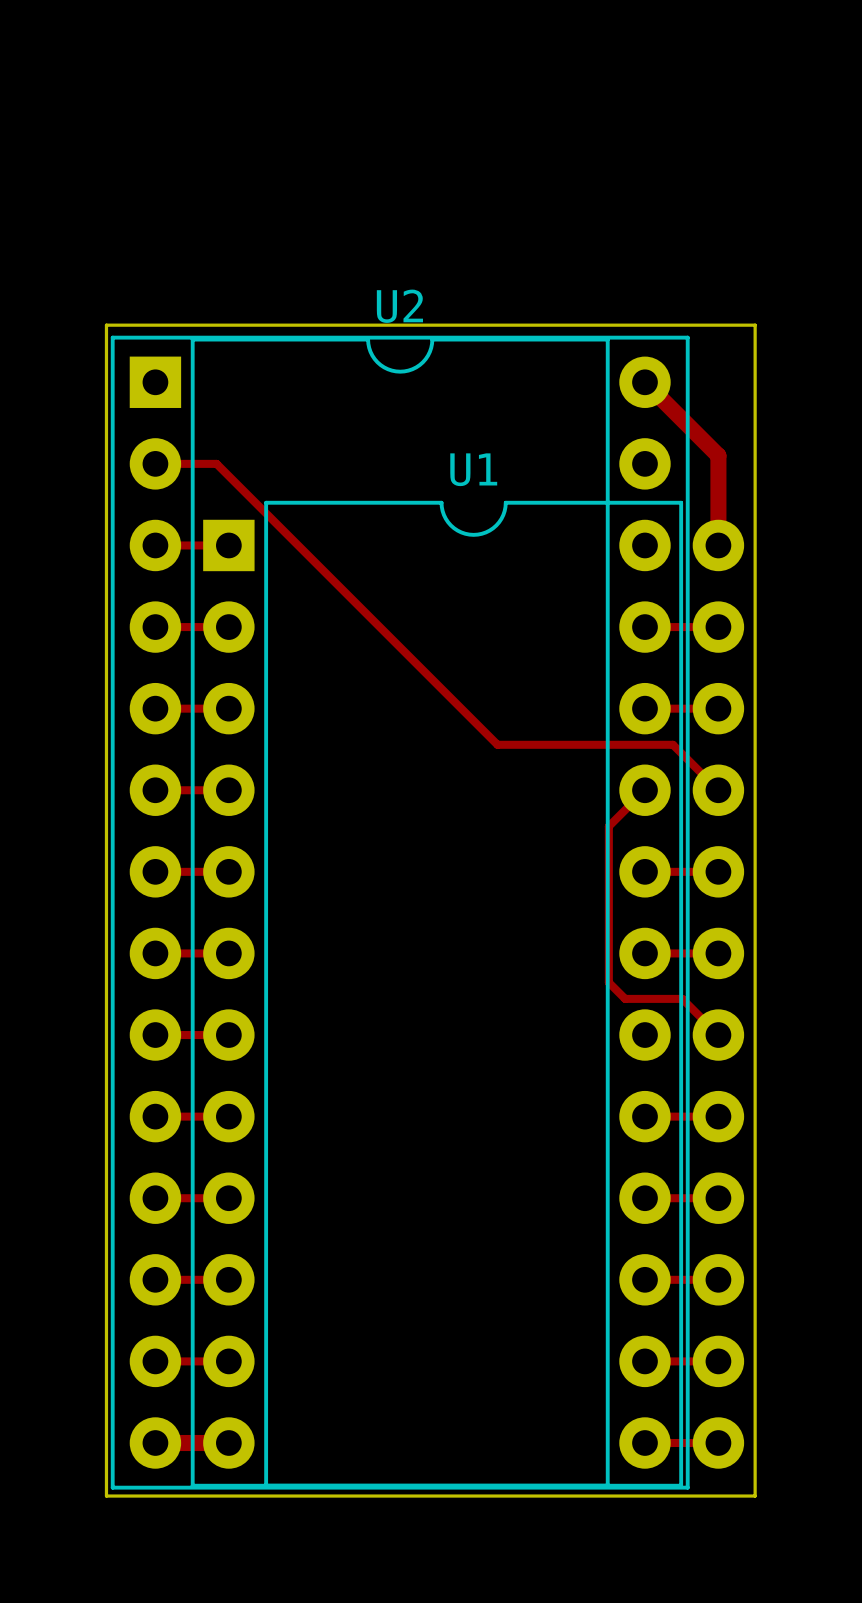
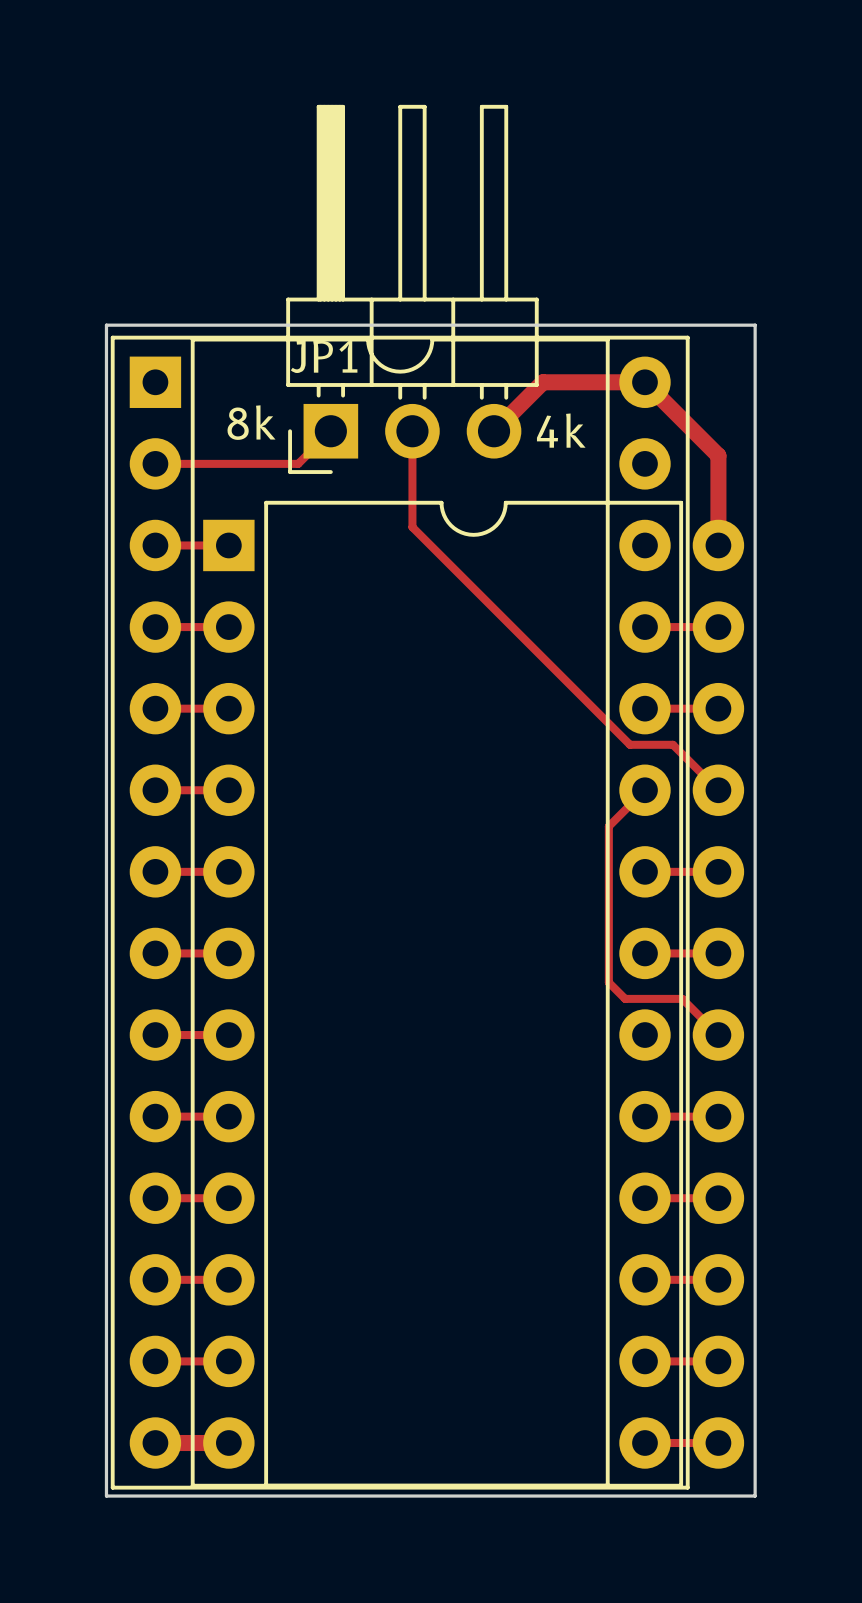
JP1: none -> (412, 289)
U2 name: U2 (399, 306) -> none
track: none -> (644, 382) (543, 382) (494, 431)
text: none -> 8k (251, 422)
text: none -> 4k (561, 430)
track: none -> (330, 431) (298, 463) (216, 463)
track: (216, 463) (497, 744) (630, 744) -> (412, 431) (412, 527) (630, 744)
U1 name: U1 (473, 469) -> none

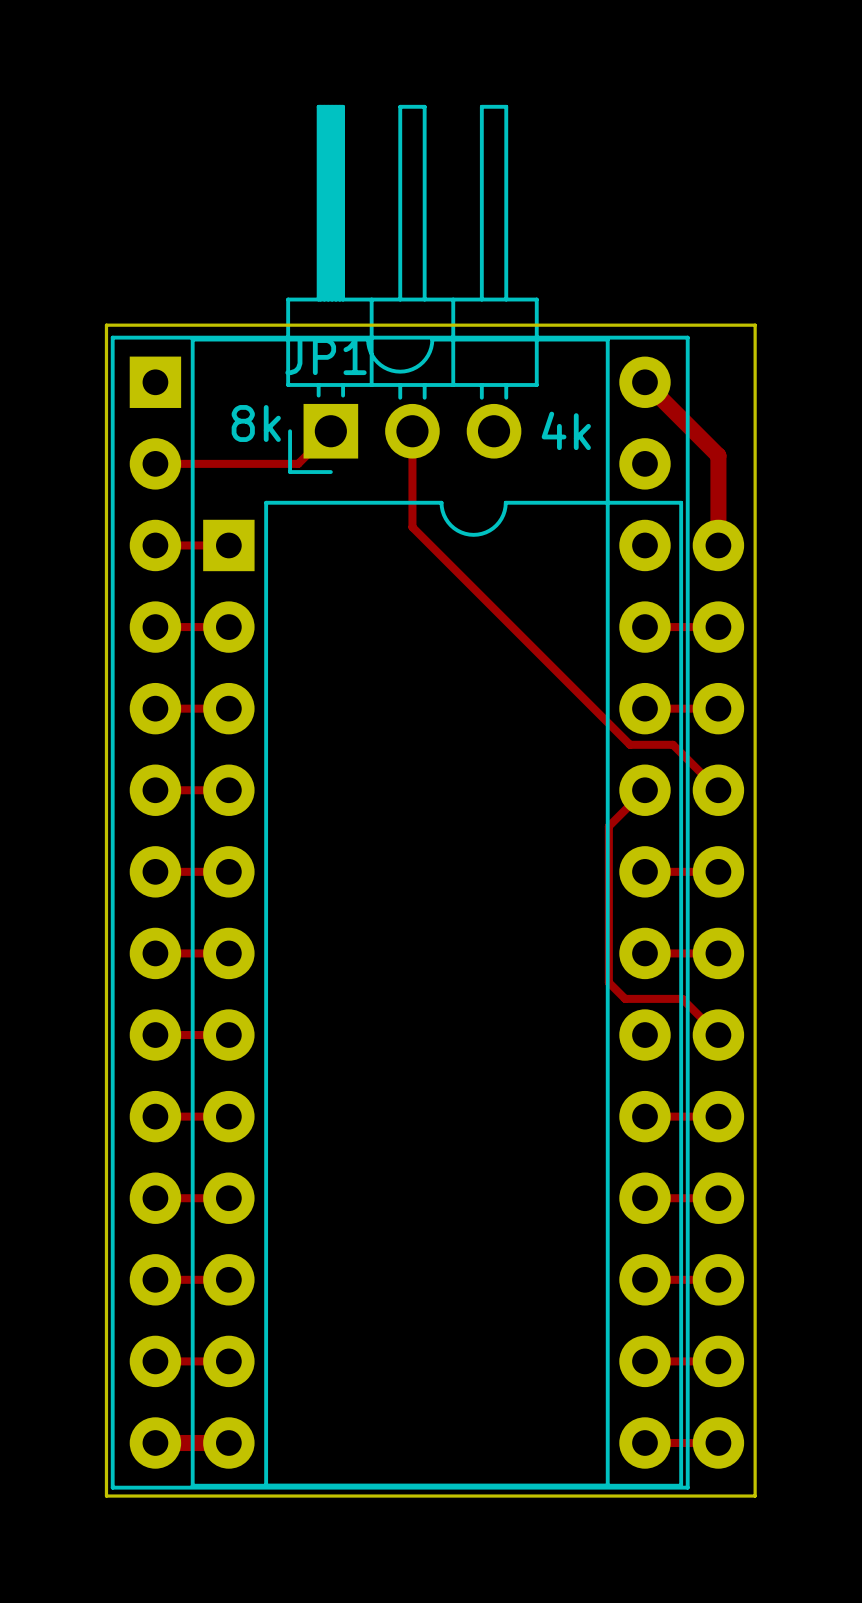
track: (644, 382) (543, 382) (494, 431) -> none

